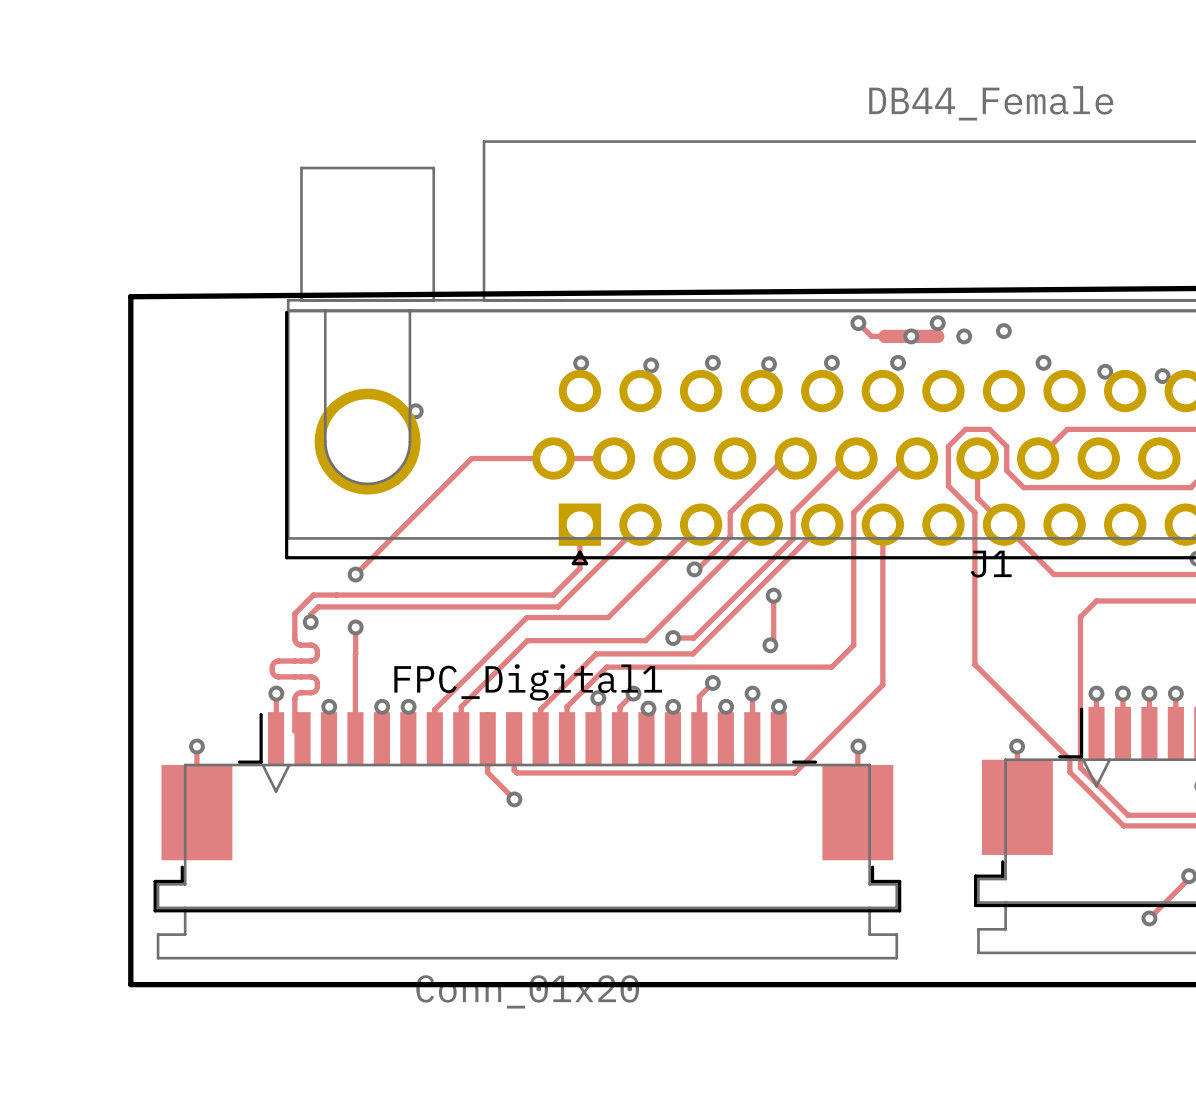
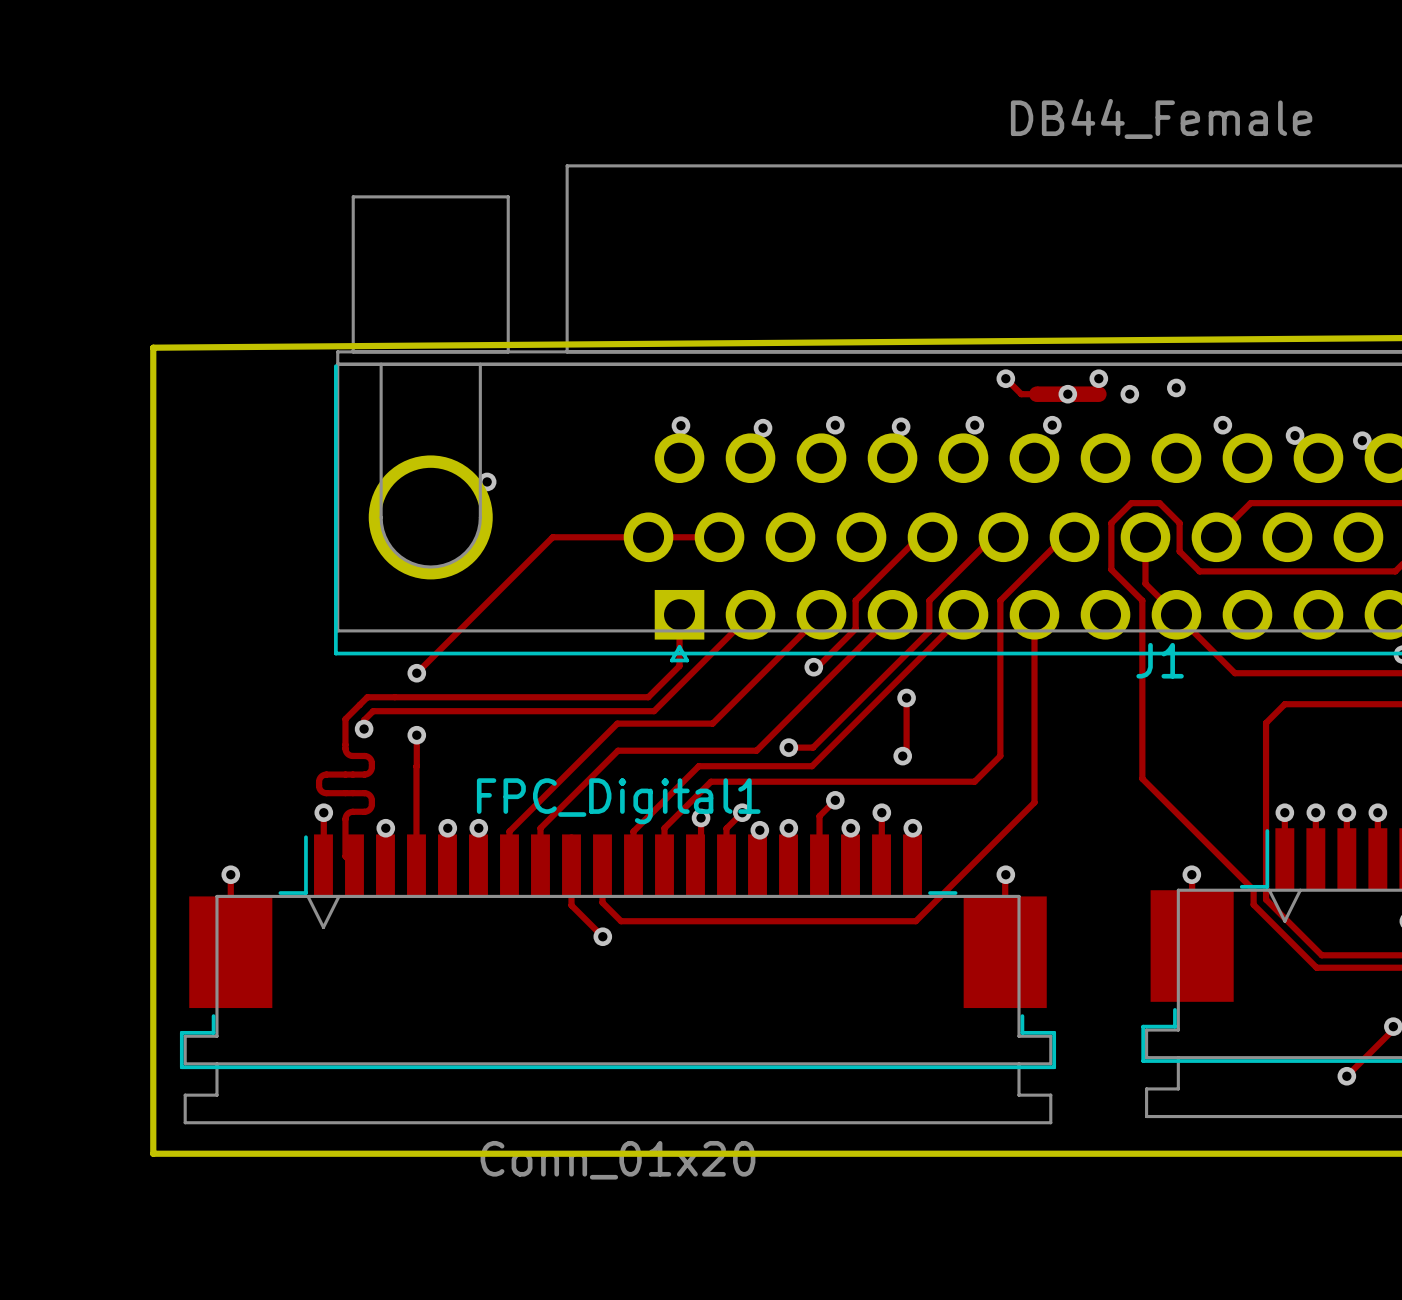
track: (516, 772) (794, 772) -> (605, 905) (621, 921) (915, 921) (931, 905)

